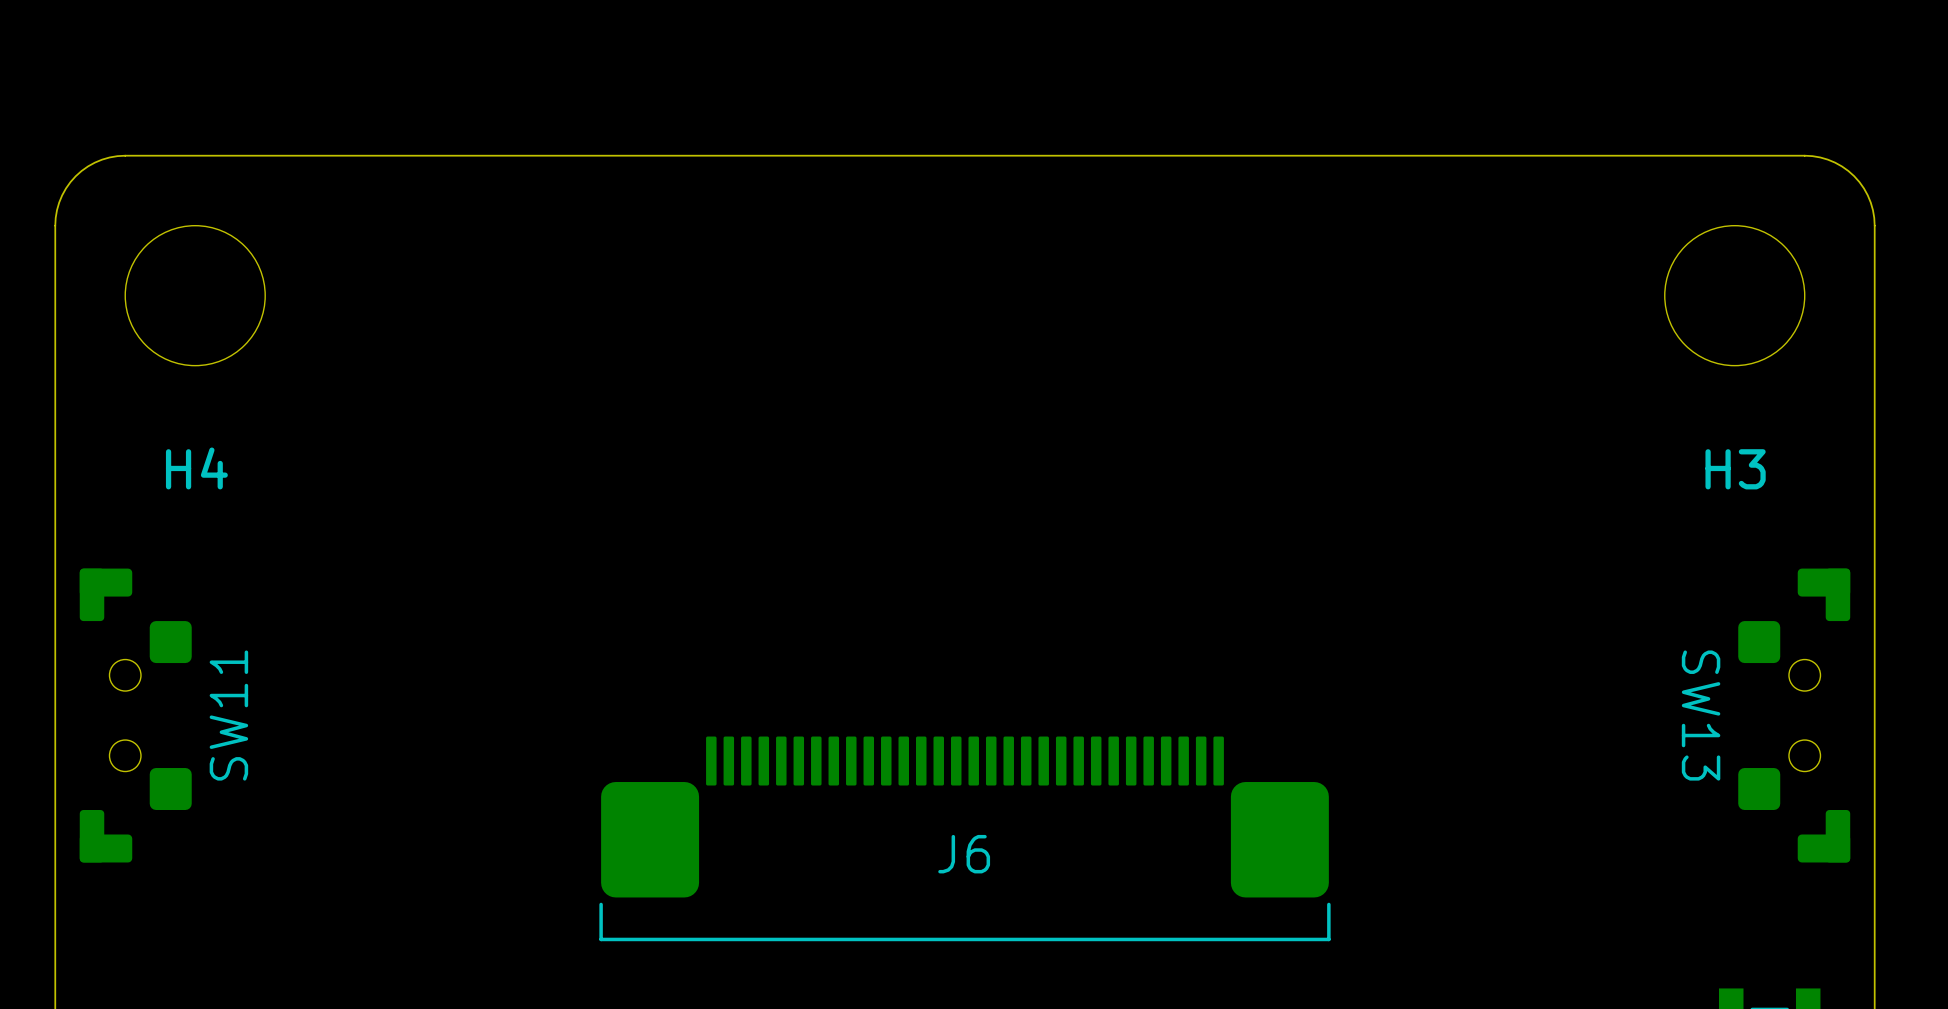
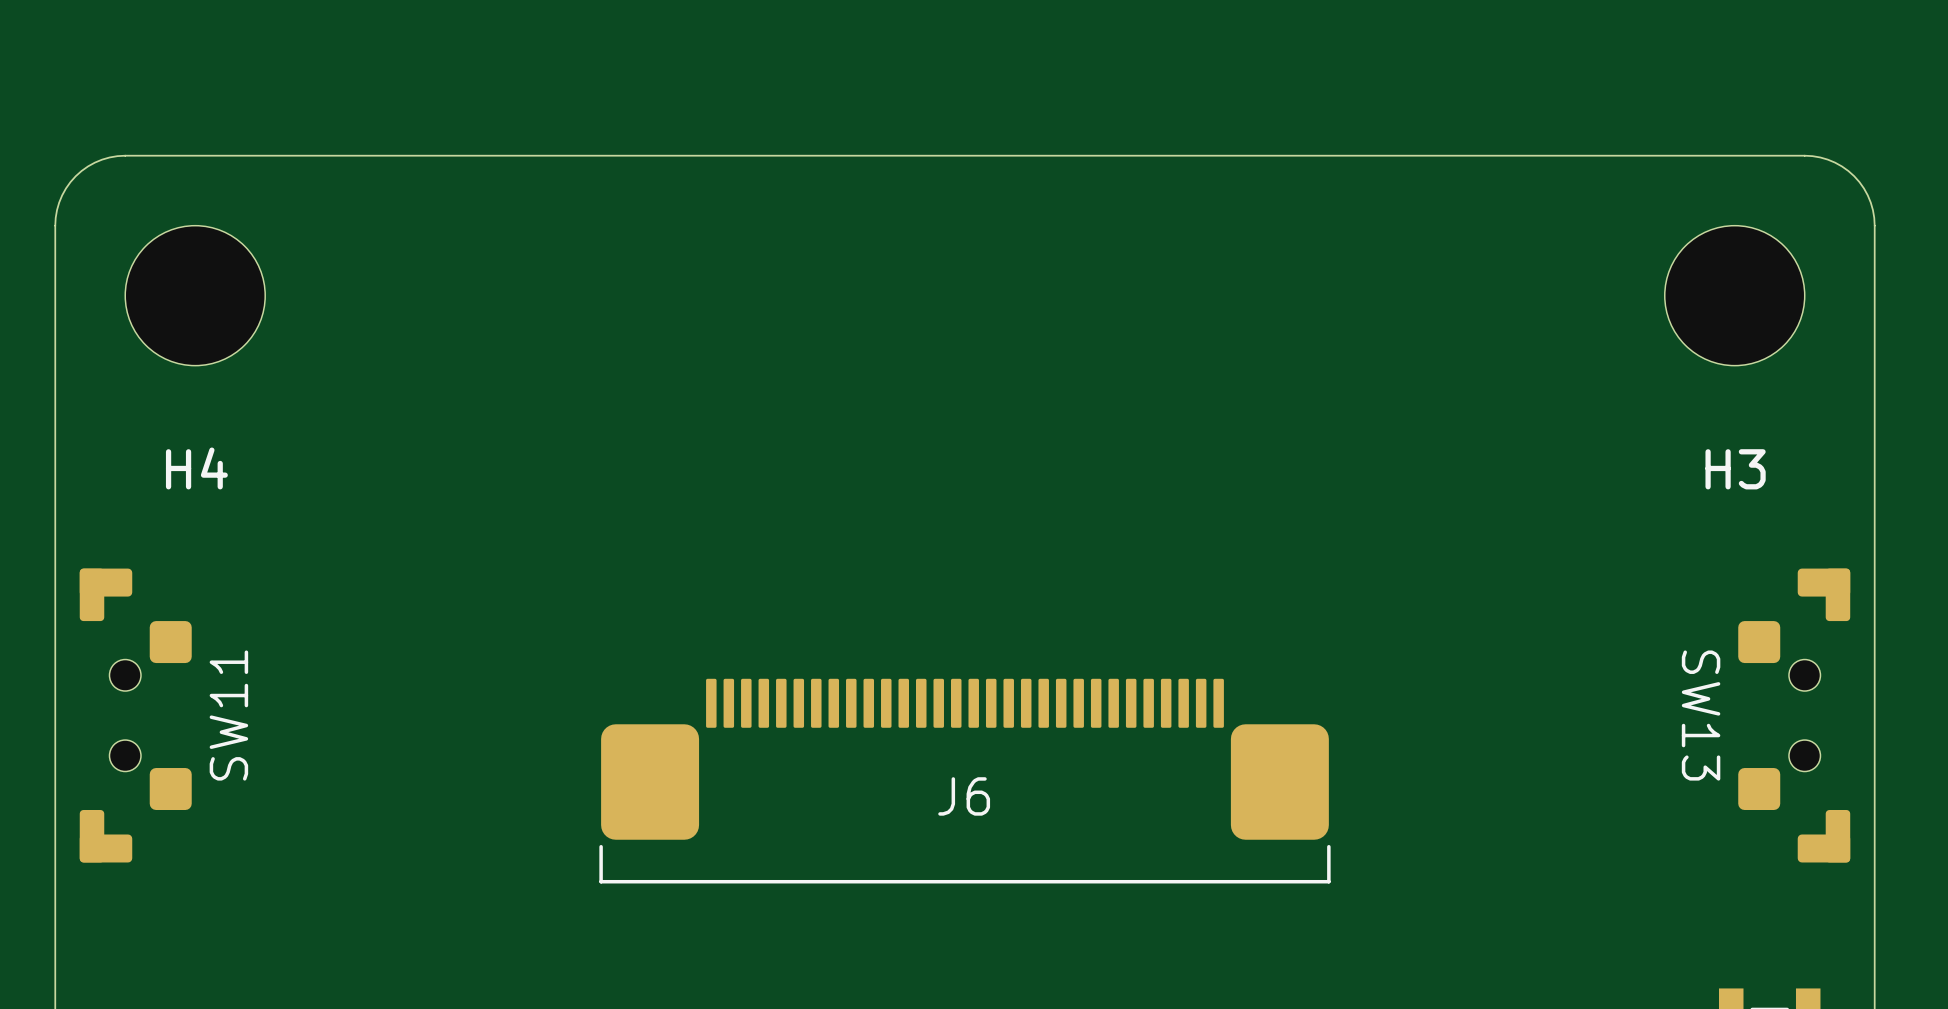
J6 position: (964, 838) -> (964, 781)

